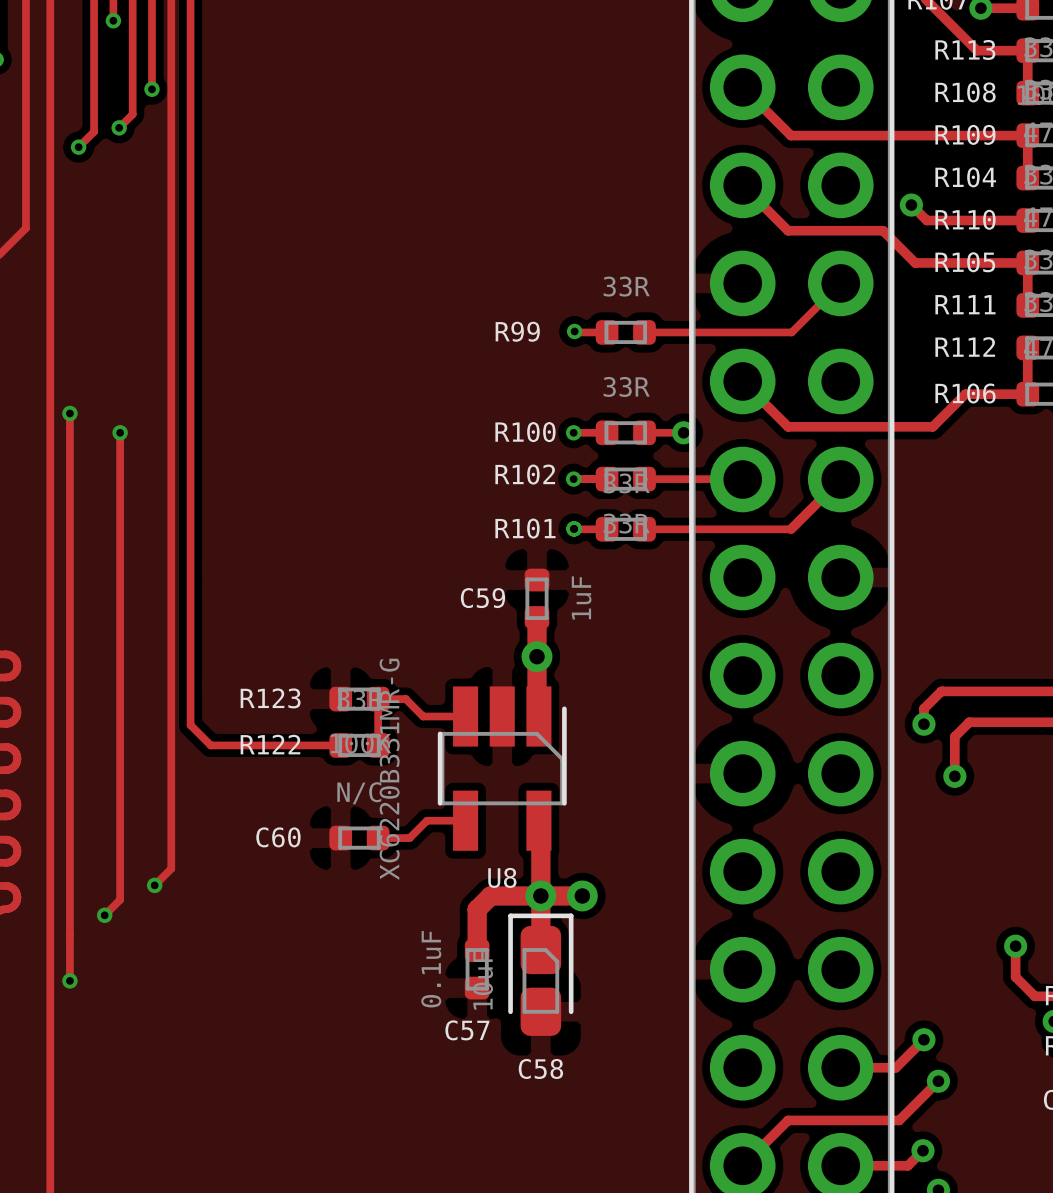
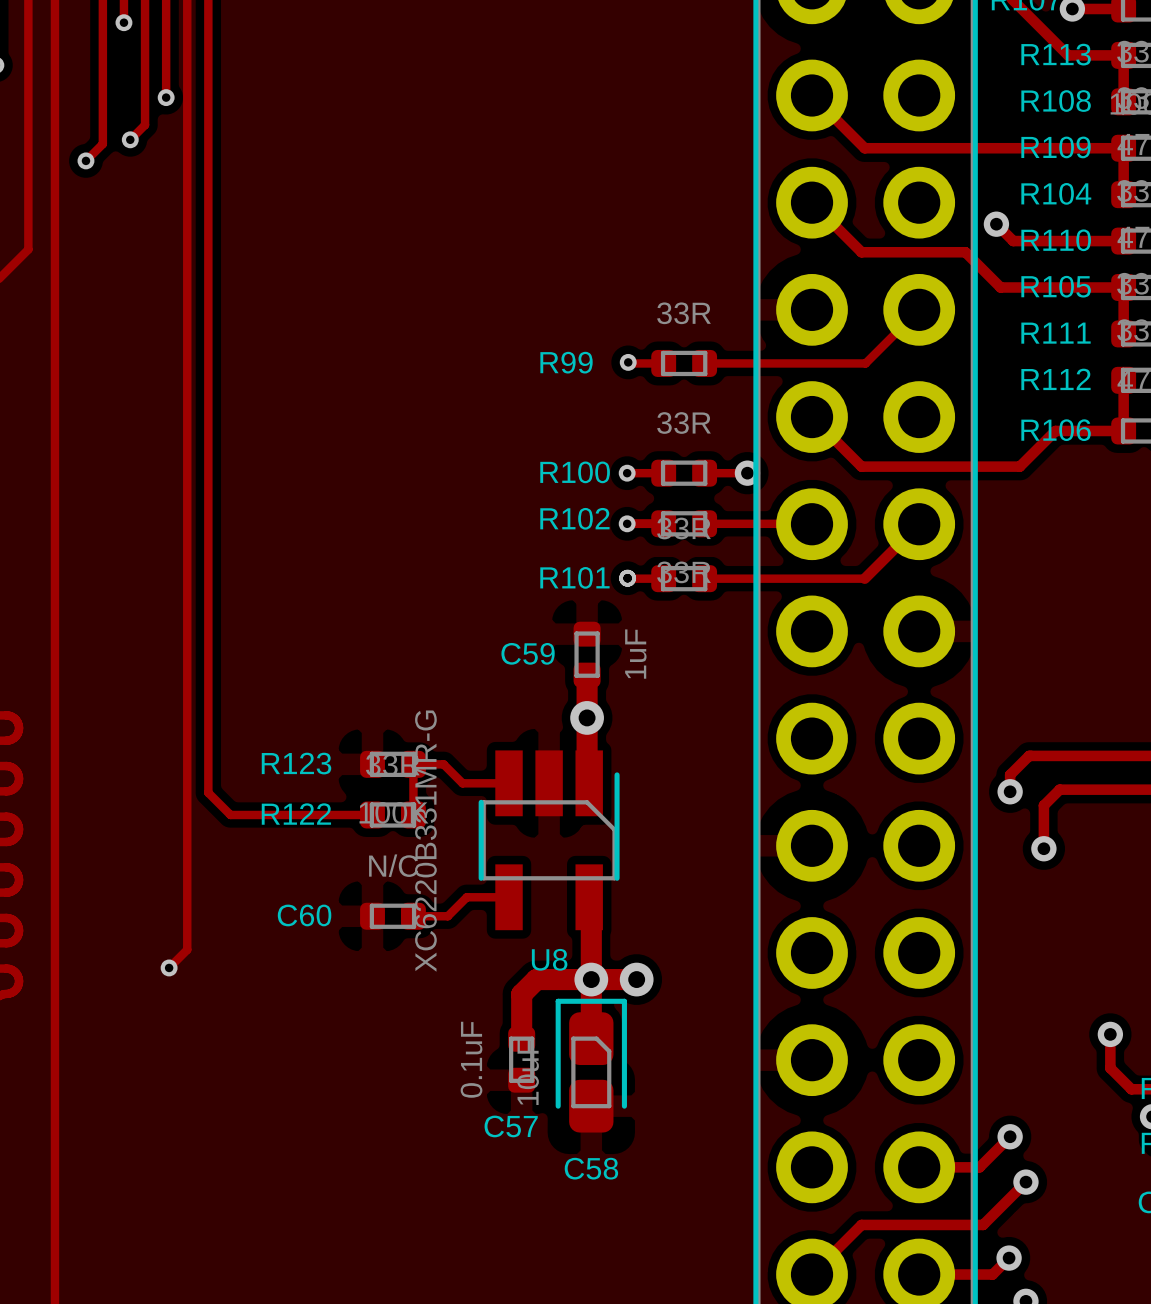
track: (69, 413) (69, 980) -> none
via: (69, 413) -> none
track: (120, 432) (120, 899) (104, 915) -> none
via: (120, 432) -> none
via: (104, 915) -> none
via: (69, 980) -> none

